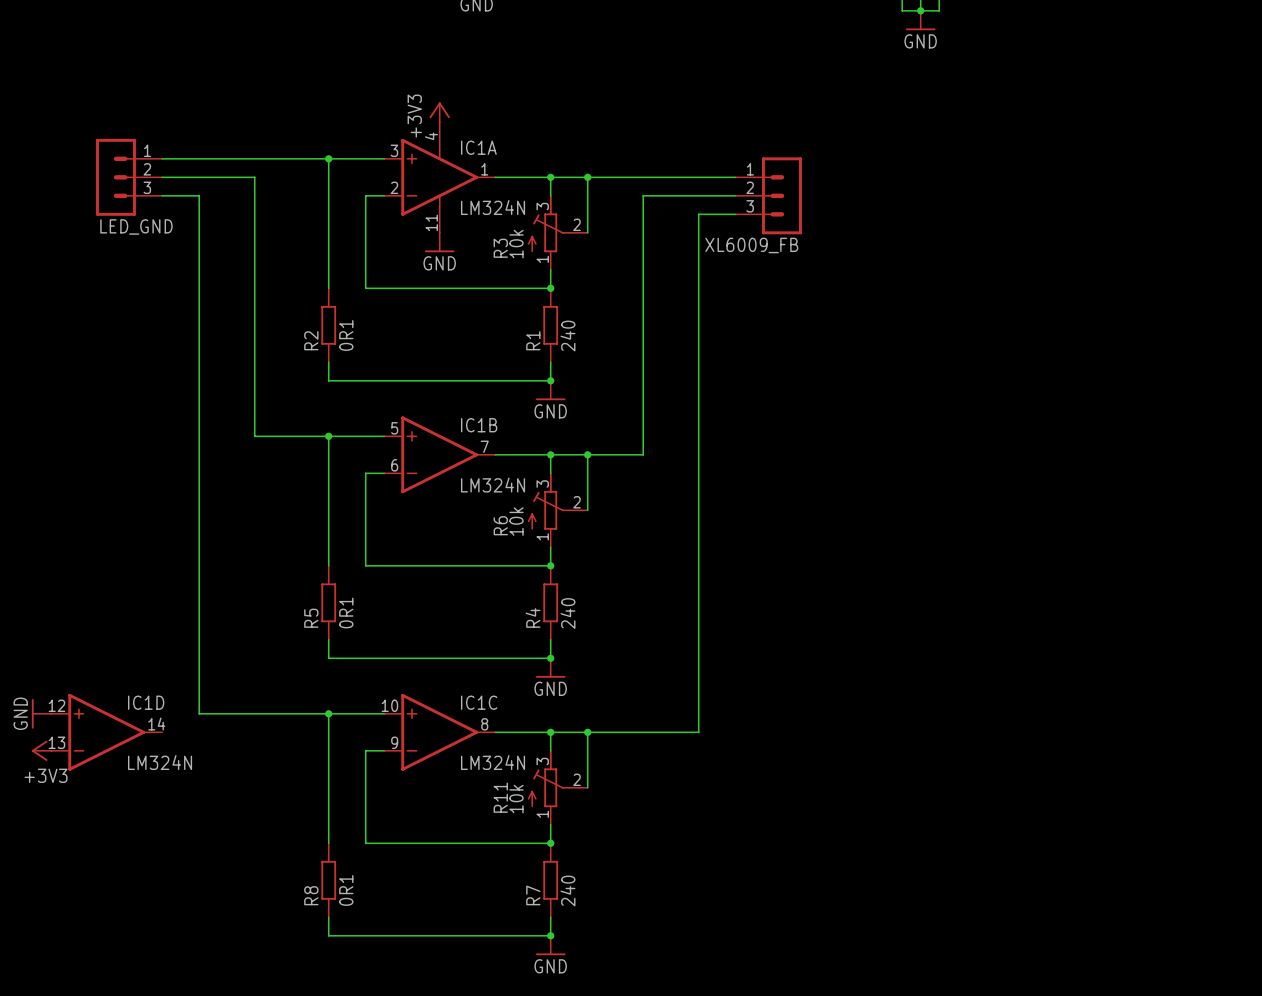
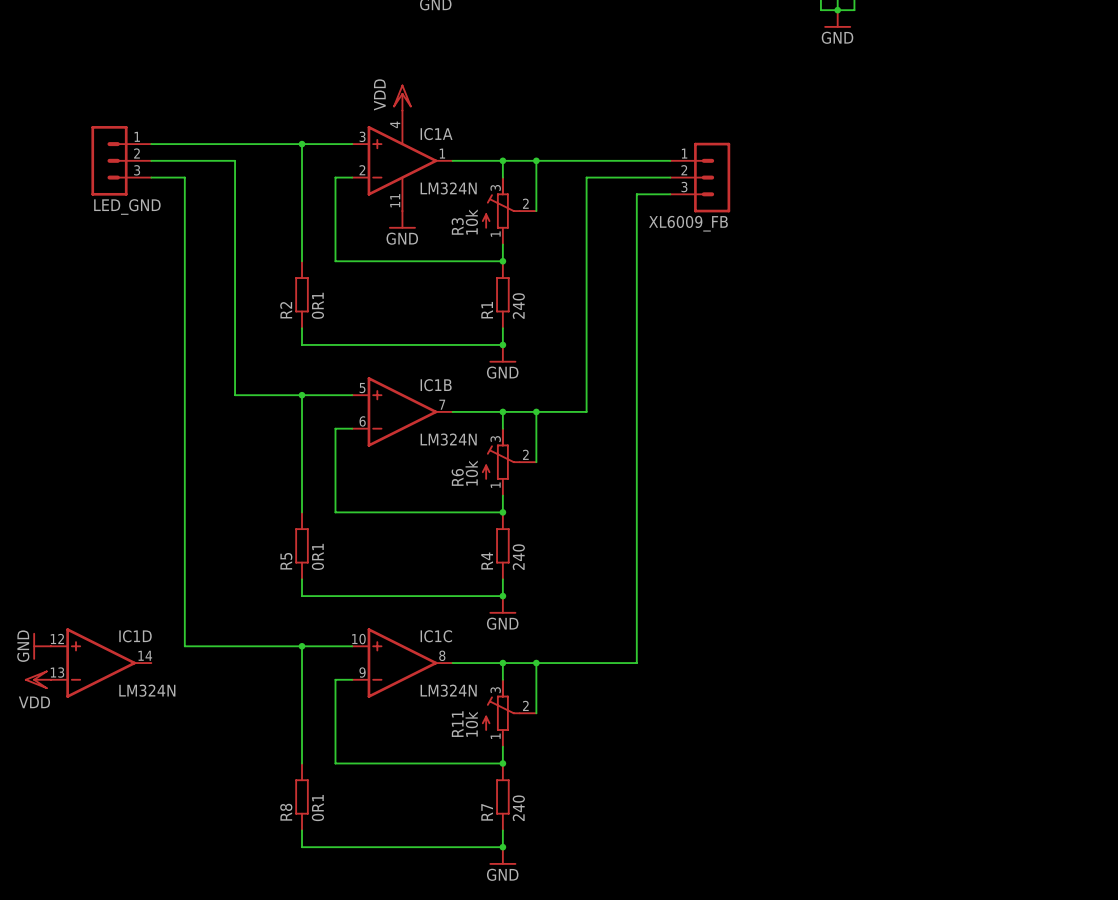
power symbol: +3V3 (439, 112) -> VDD (402, 97)
power symbol: +3V3 (41, 750) -> VDD (37, 679)

